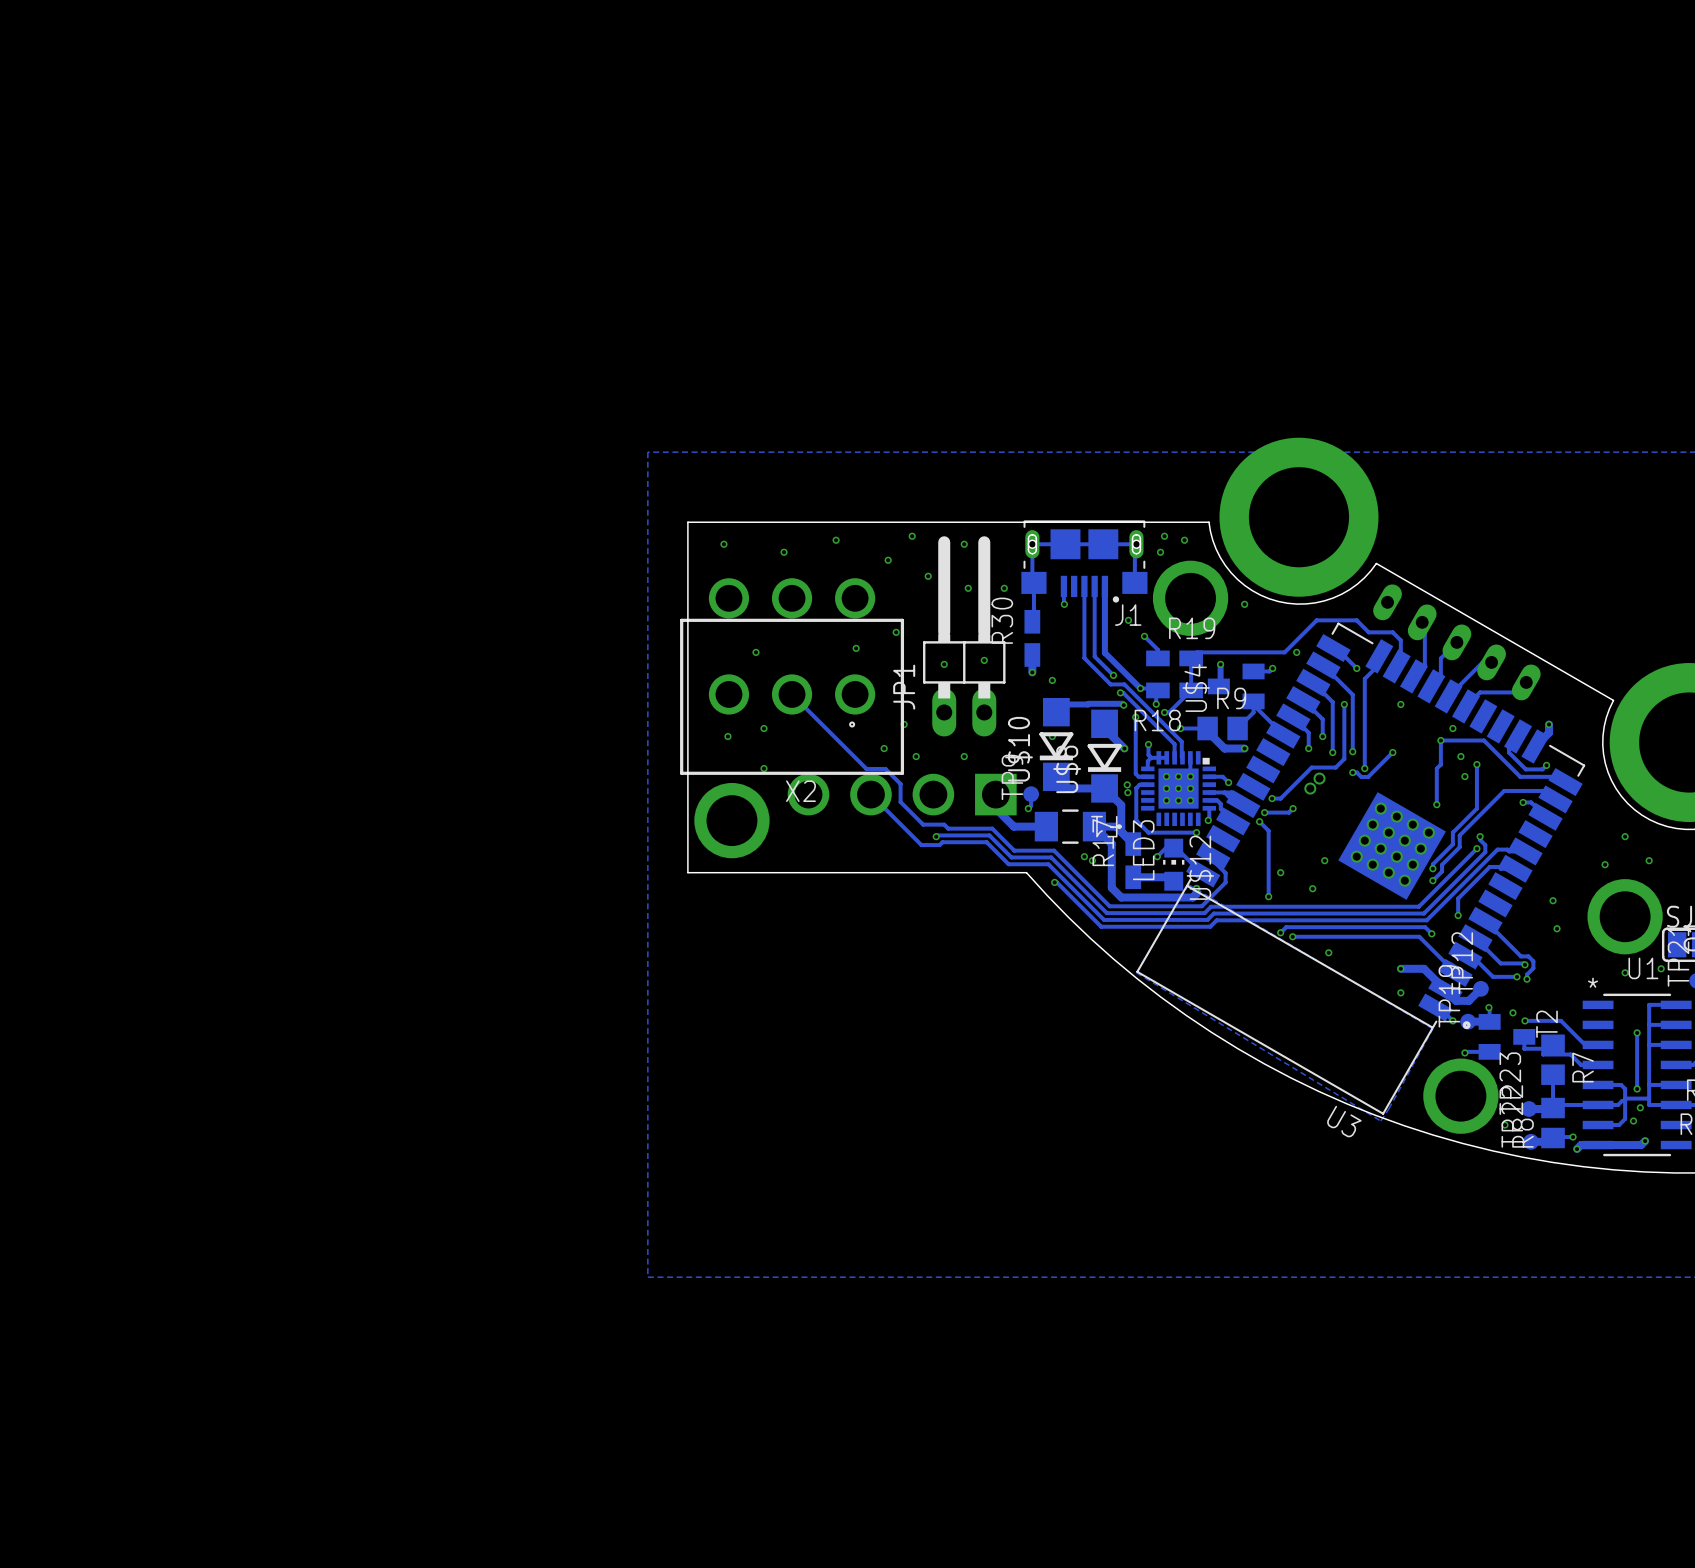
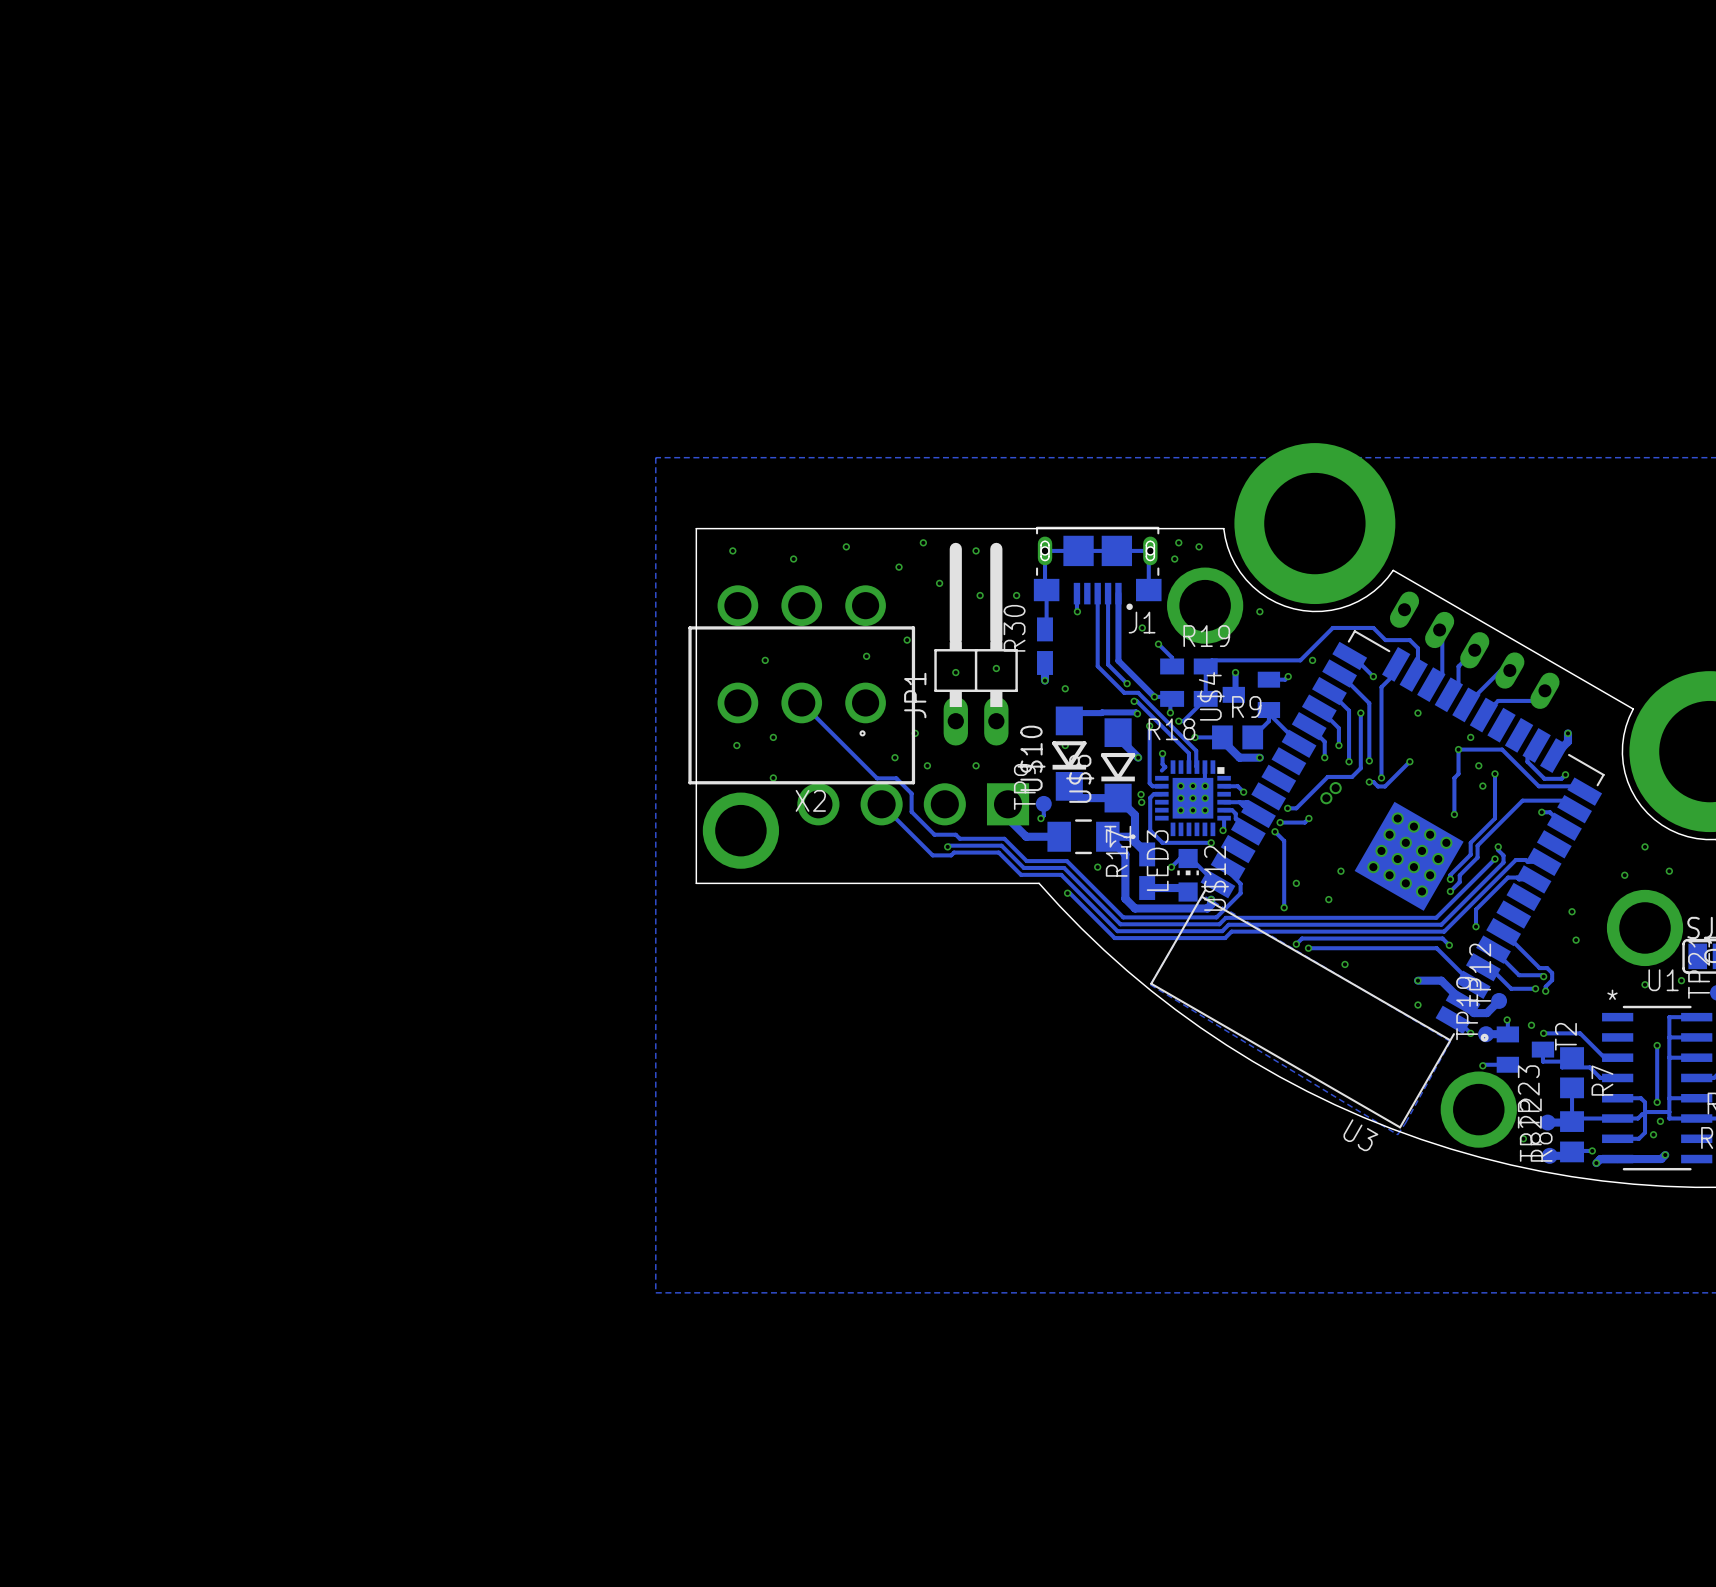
track: (1166, 757) (1151, 757) -> none
track: (1147, 761) (1147, 768) -> none
via: (1092, 860) -> none

